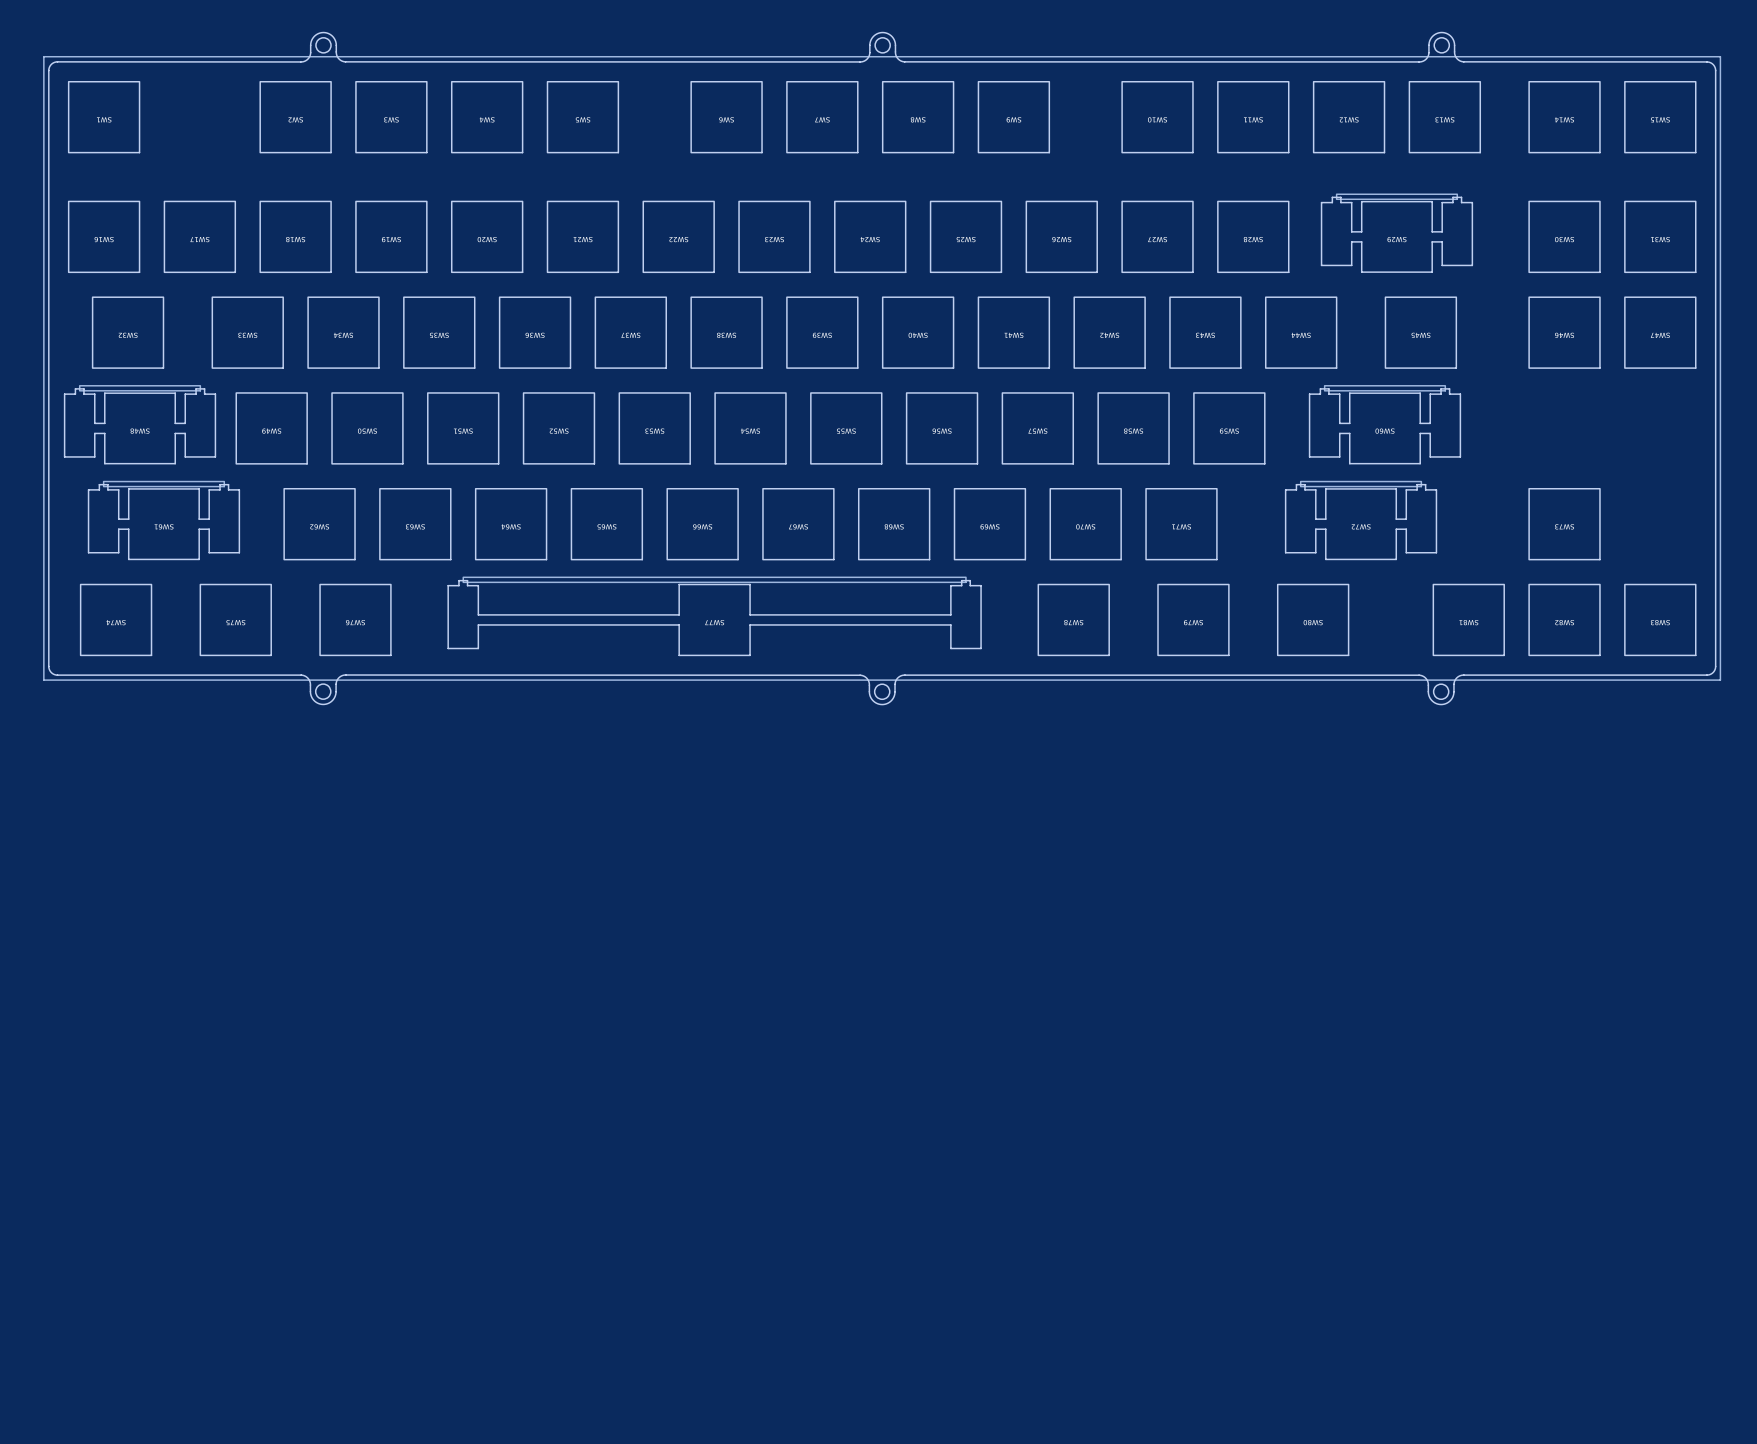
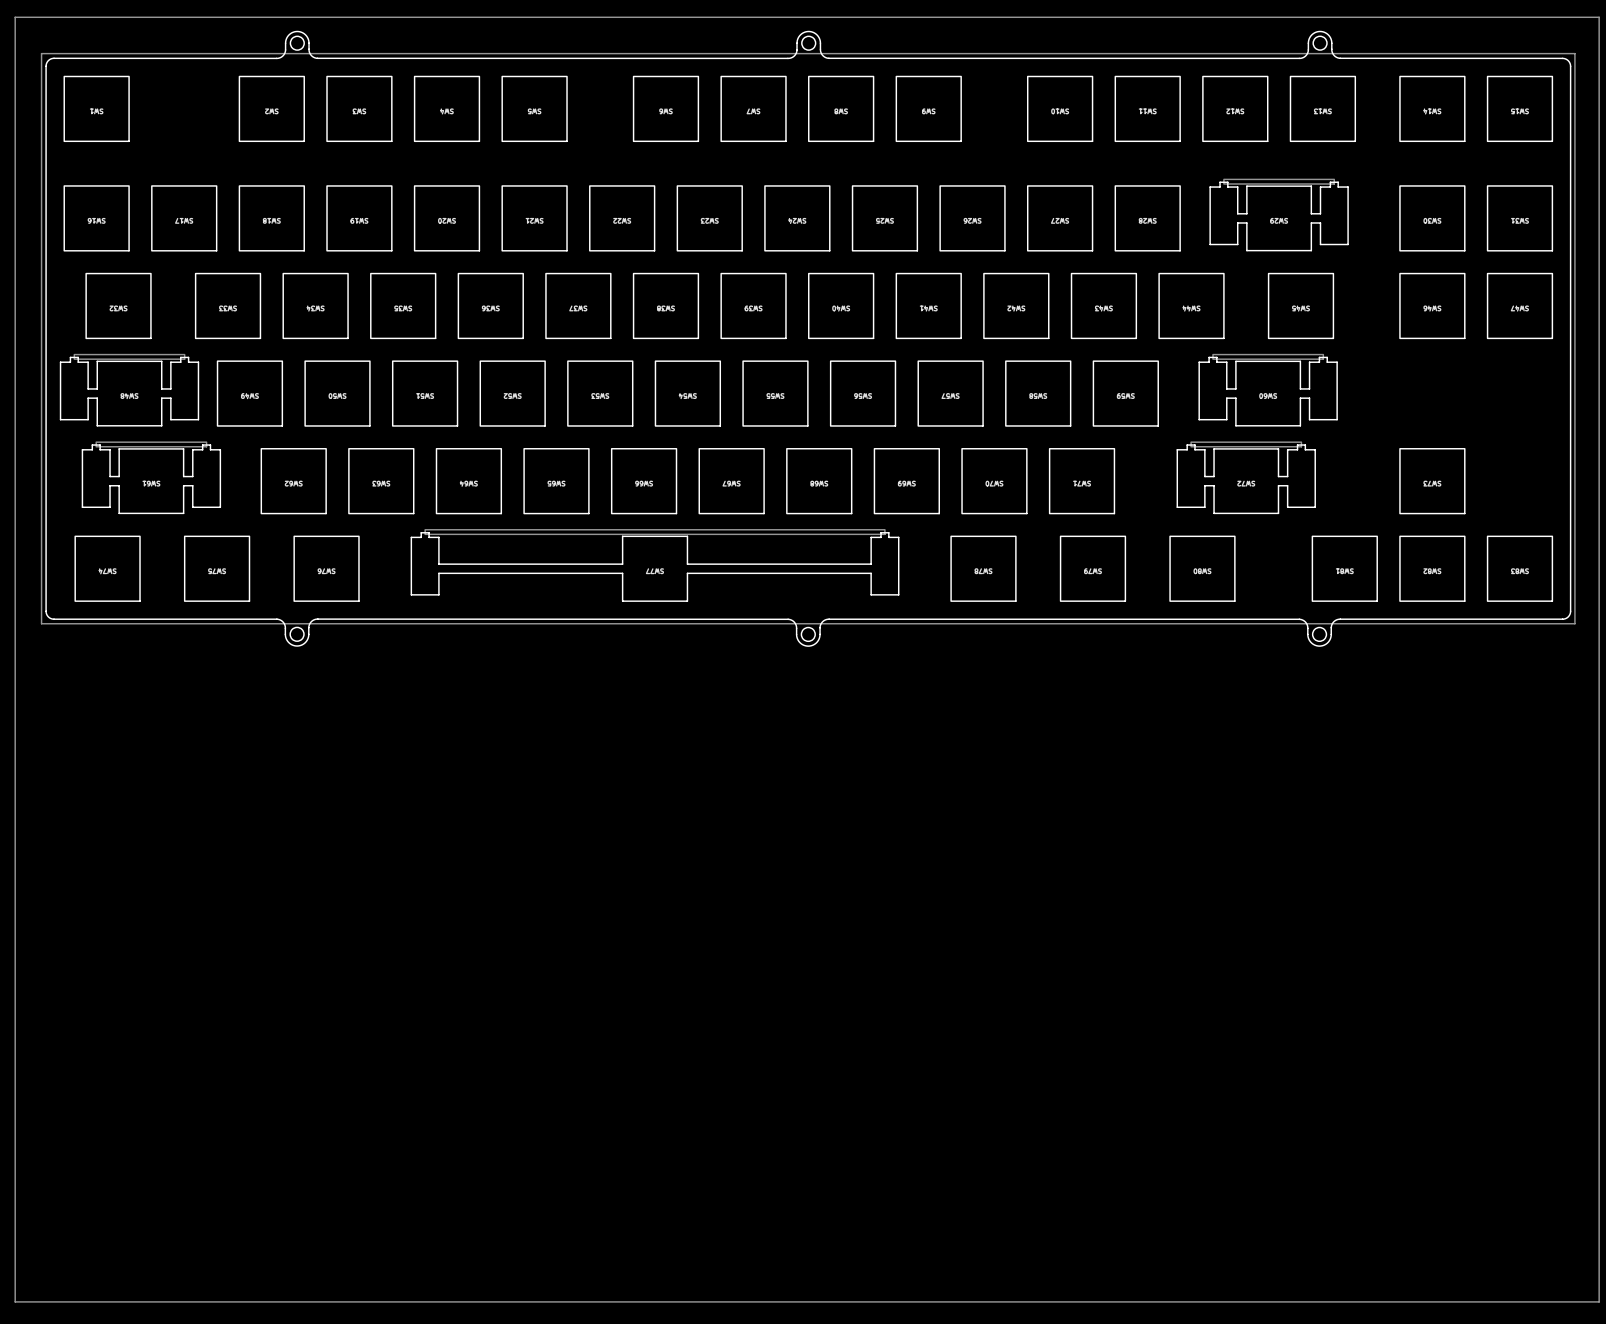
line: none -> (15, 17) (1599, 17) (1599, 1301) (15, 1301) (15, 17)

